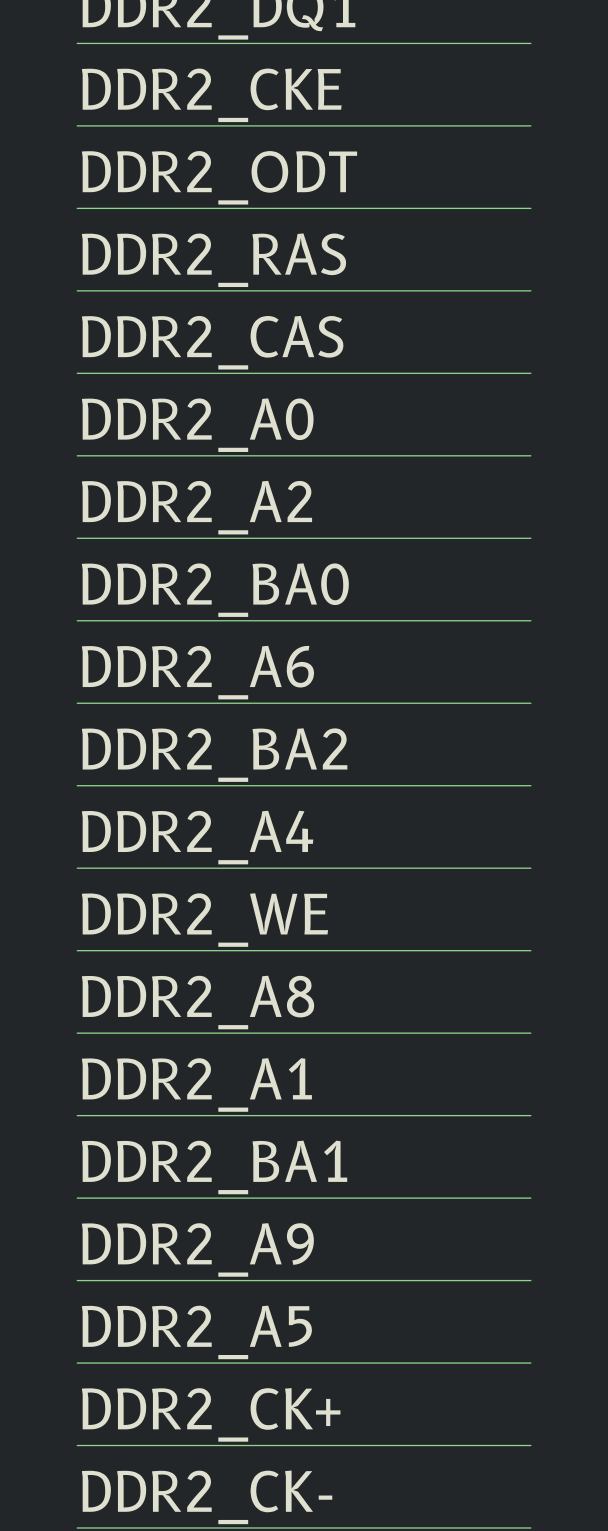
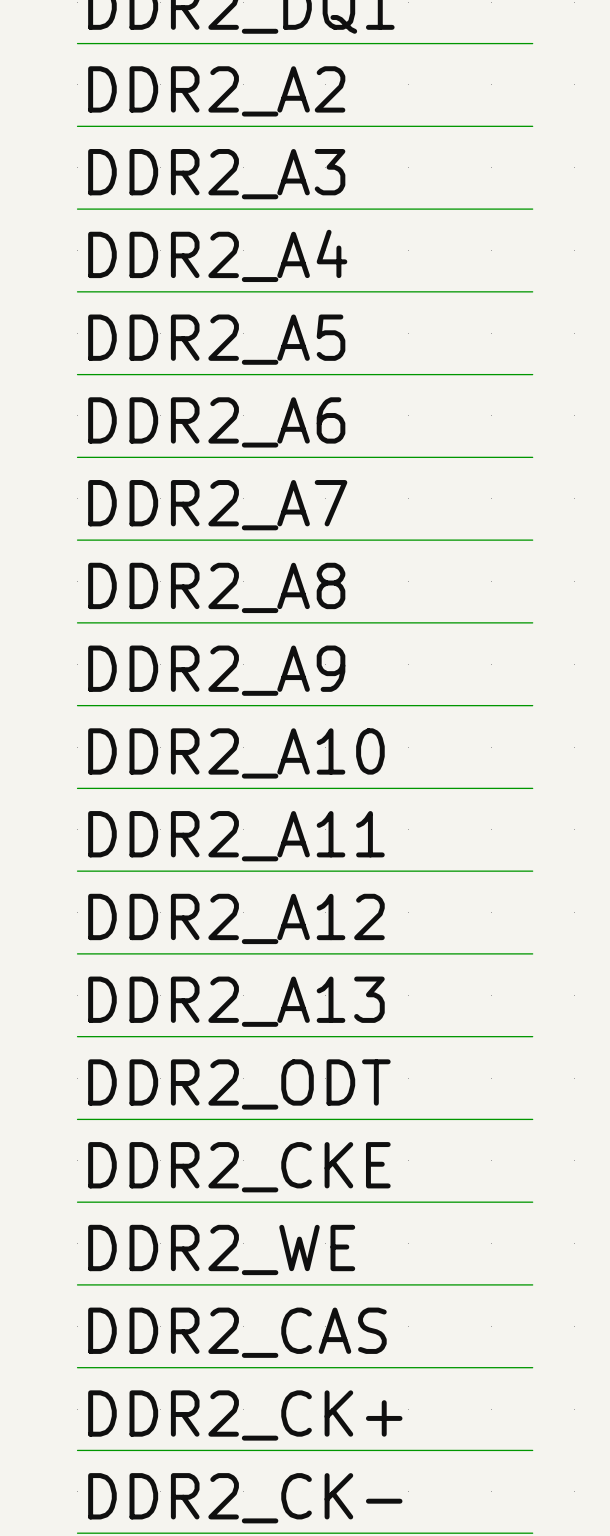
label: DDR2_CKE (211, 95) -> DDR2_A2 (216, 91)
label: DDR2_ODT (219, 177) -> DDR2_A3 (216, 174)
label: DDR2_RAS (213, 260) -> DDR2_A4 (217, 255)
label: DDR2_CAS (212, 342) -> DDR2_A5 (216, 339)
label: DDR2_A0 (197, 425) -> DDR2_A6 (216, 422)
label: DDR2_A2 (196, 507) -> DDR2_A7 (217, 505)
label: DDR2_BA0 (215, 590) -> DDR2_A8 (216, 587)
label: DDR2_A6 (197, 672) -> DDR2_A9 (216, 670)
label: DDR2_BA2 (214, 755) -> DDR2_A10 (236, 753)
label: DDR2_A4 (197, 837) -> DDR2_A11 (236, 836)
label: DDR2_WE (204, 920) -> DDR2_A12 (236, 918)
label: DDR2_A8 (198, 1002) -> DDR2_A13 (236, 1001)
label: DDR2_A1 (196, 1084) -> DDR2_ODT (239, 1084)
label: DDR2_BA1 (214, 1167) -> DDR2_CKE (239, 1167)
label: DDR2_A9 (197, 1249) -> DDR2_WE (221, 1249)
label: DDR2_A5 (196, 1332) -> DDR2_CAS (237, 1332)

